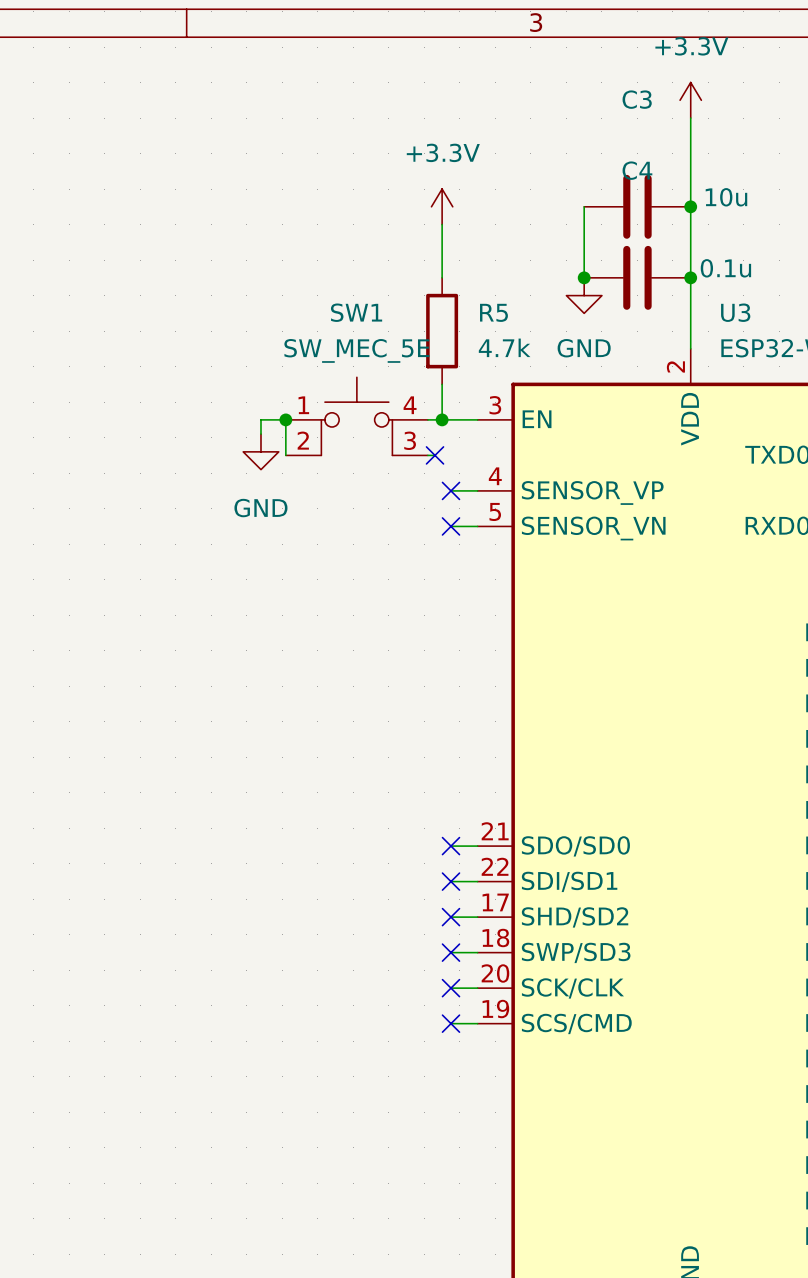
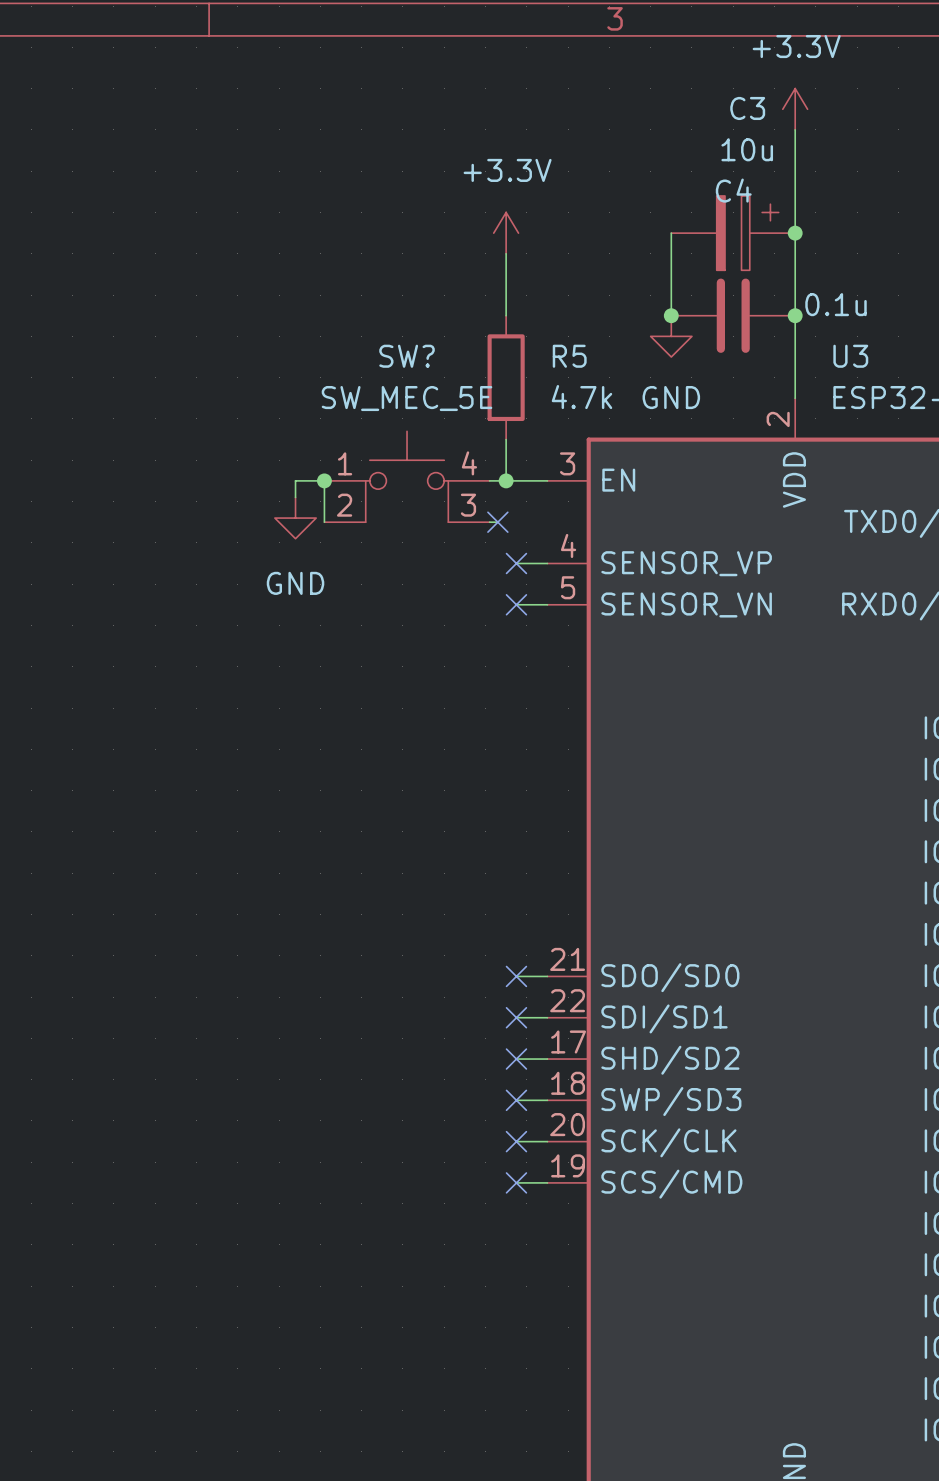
C3 symbol: [584, 174, 691, 239] -> [671, 195, 796, 271]
C3 value position: 10u (726, 197) -> 10u (747, 149)
SW1 name: SW1 (356, 312) -> SW? (407, 356)

